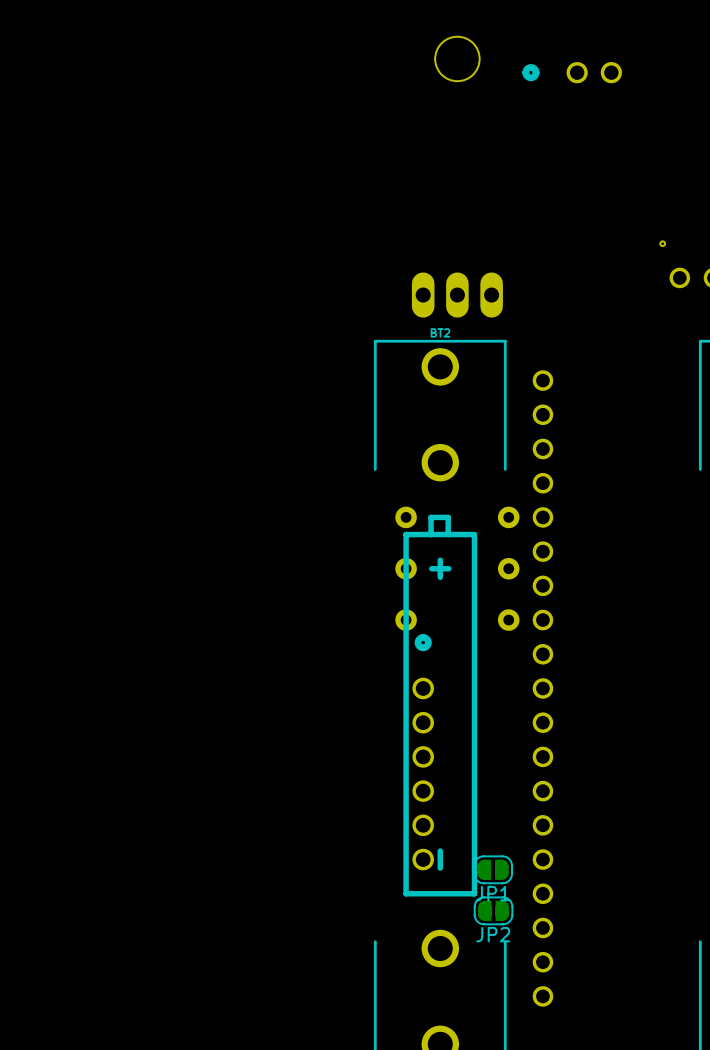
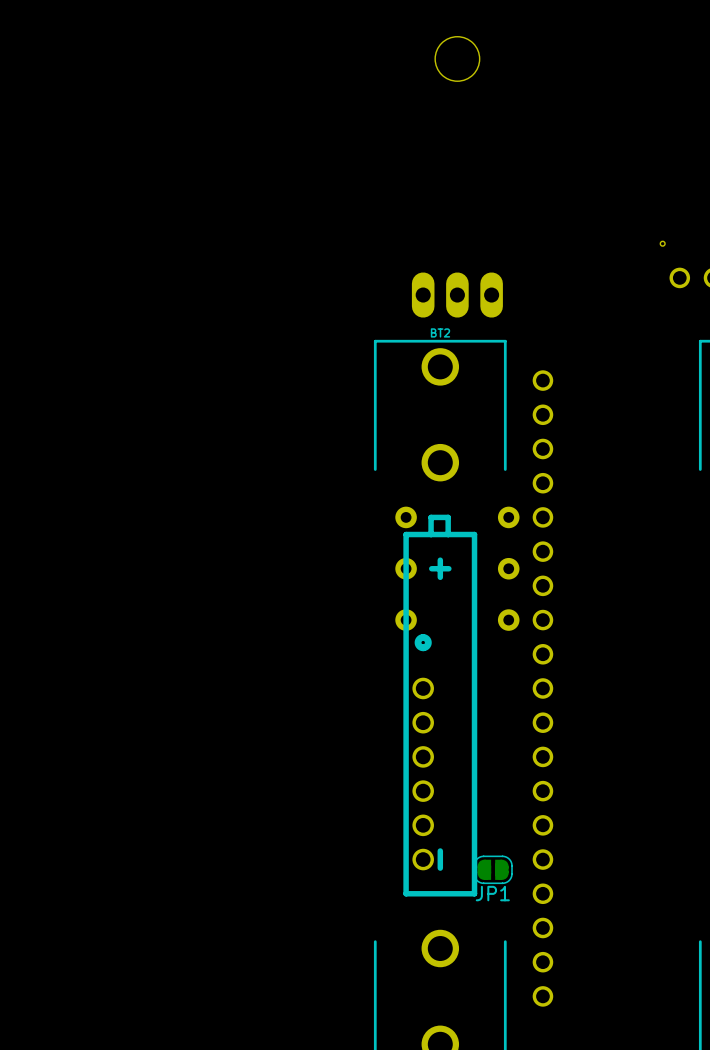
part: (572, 72) -> none
JP2: (493, 910) -> none

